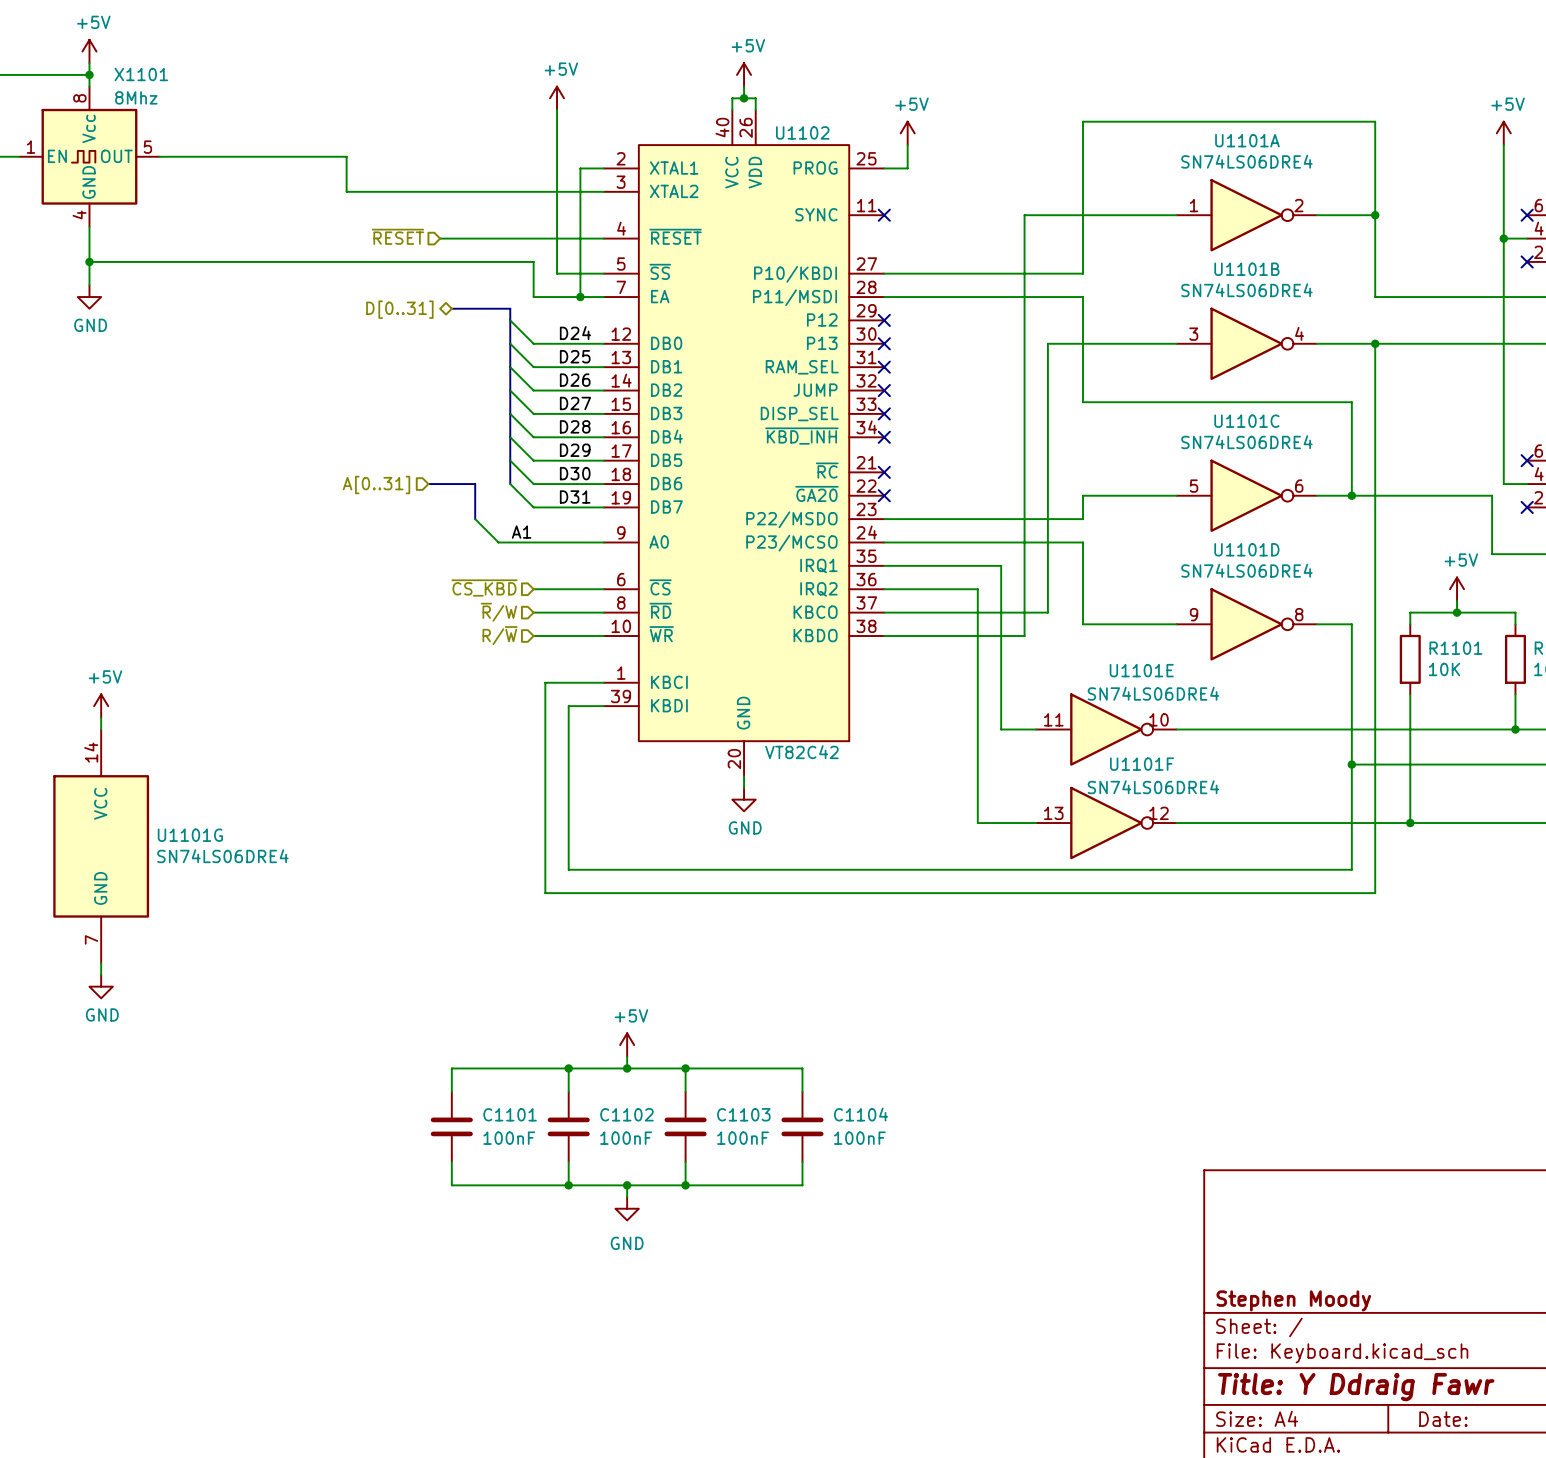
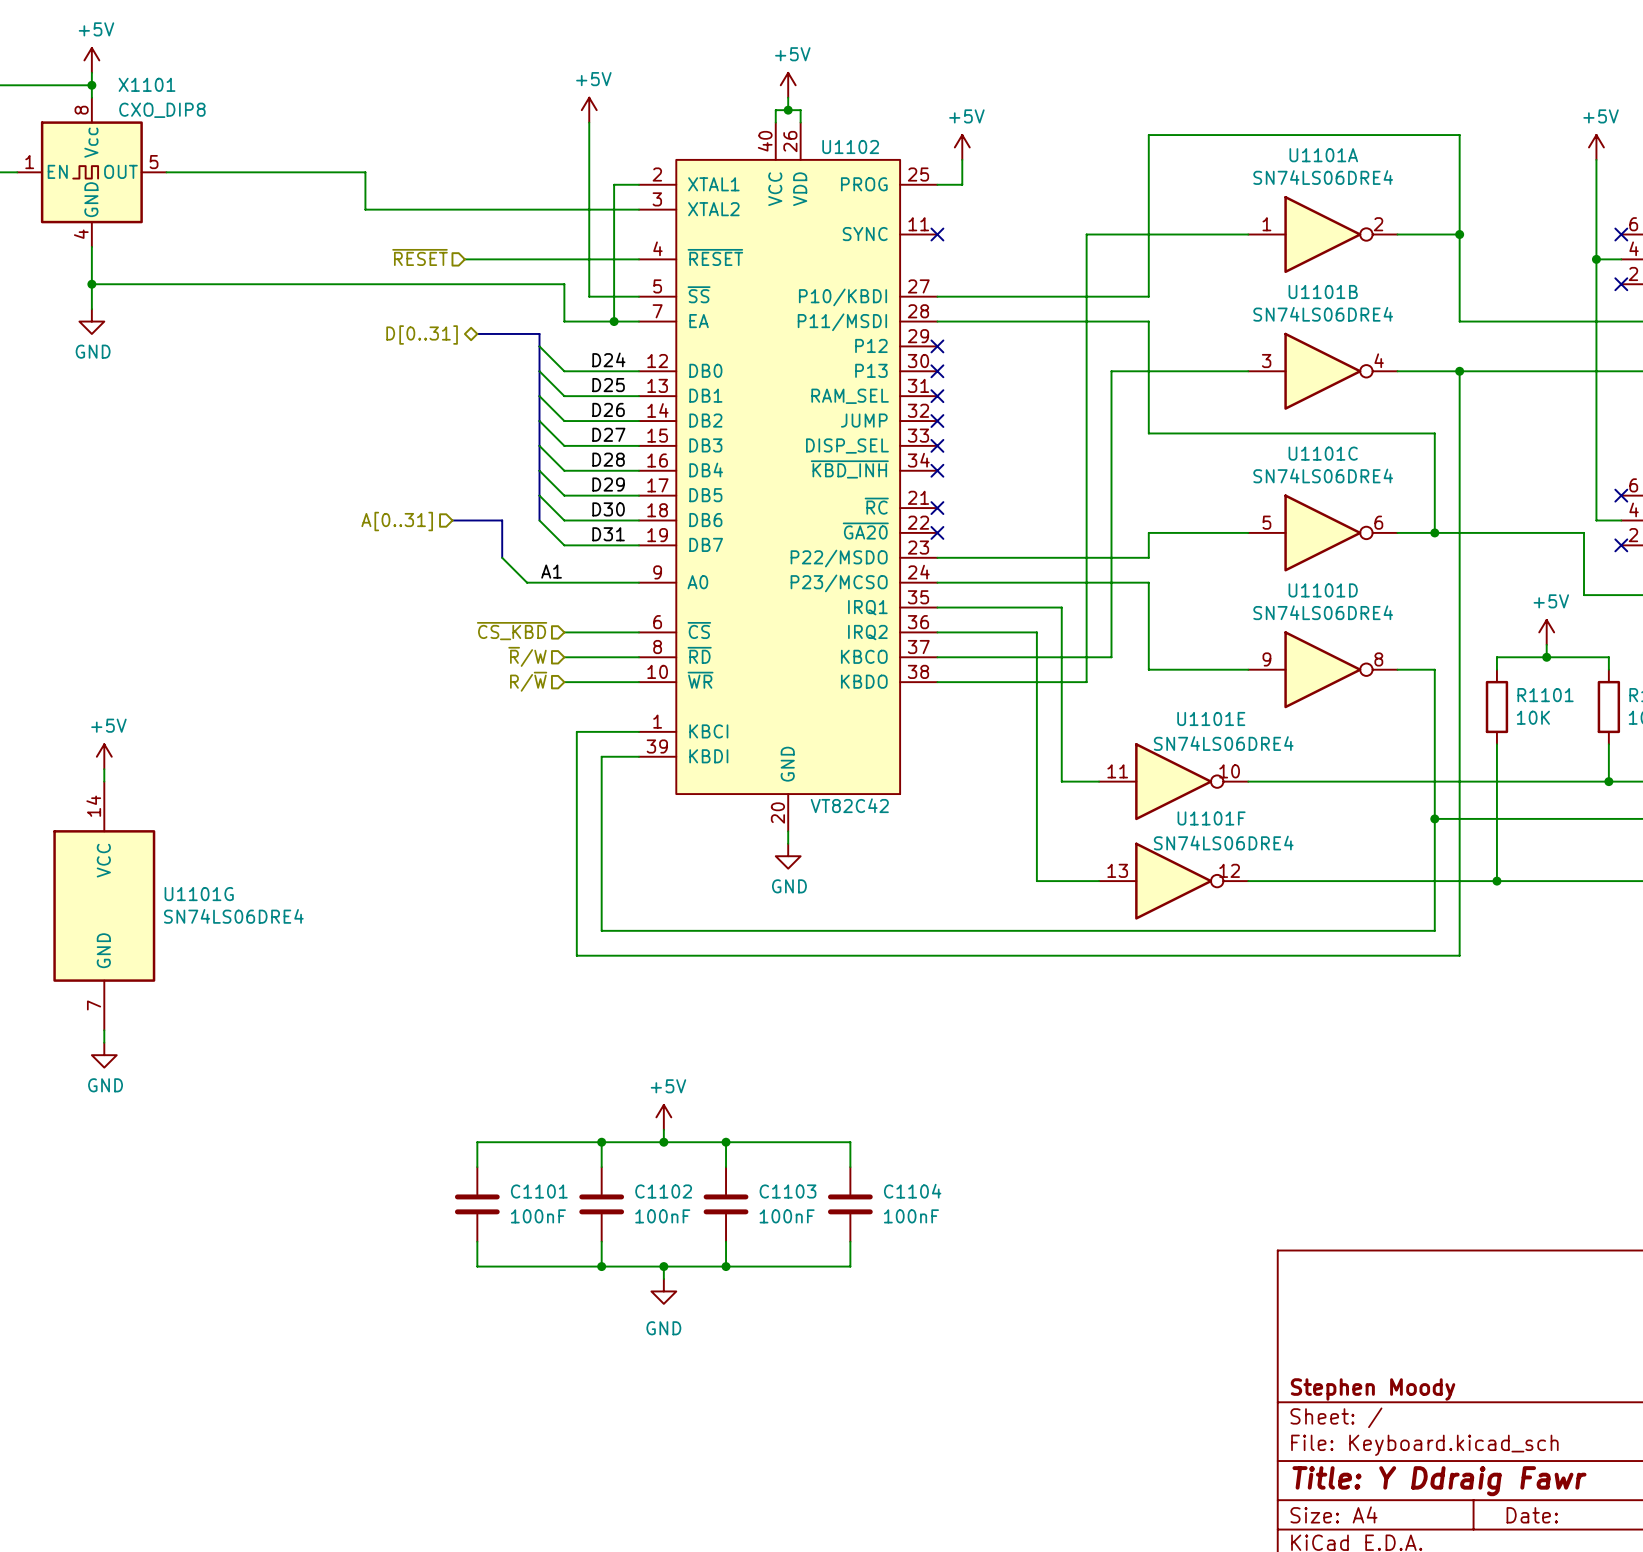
X1101 value: 8Mhz (136, 97) -> CXO_DIP8 (162, 110)

